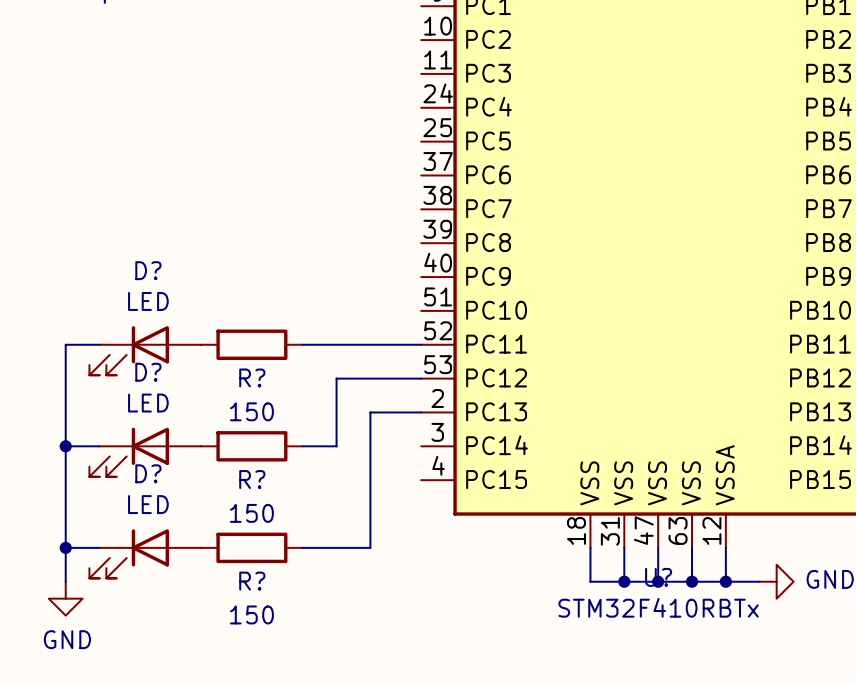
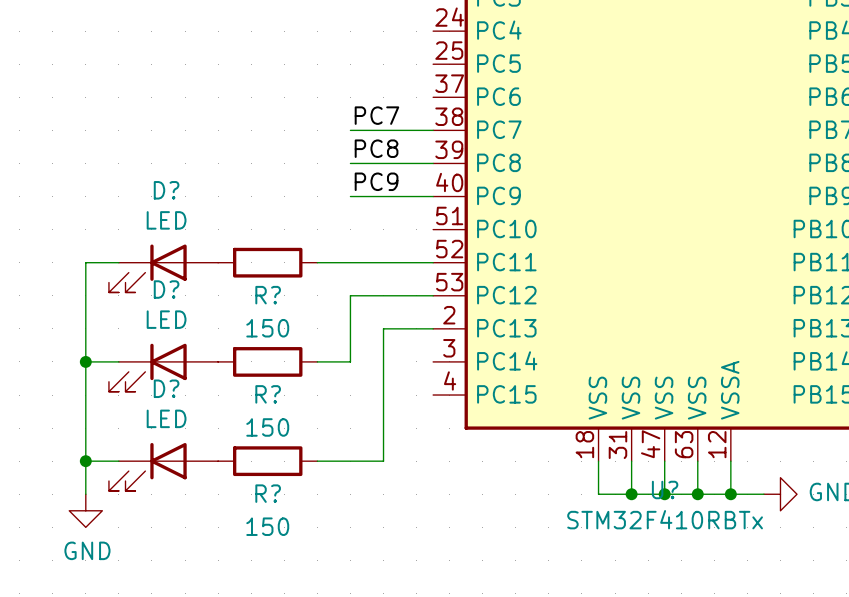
label: none -> PC7 (376, 115)
wire: none -> (350, 130) (433, 130)
label: none -> PC8 (376, 148)
wire: none -> (350, 163) (433, 163)
label: none -> PC9 (376, 181)
wire: none -> (350, 196) (433, 196)

